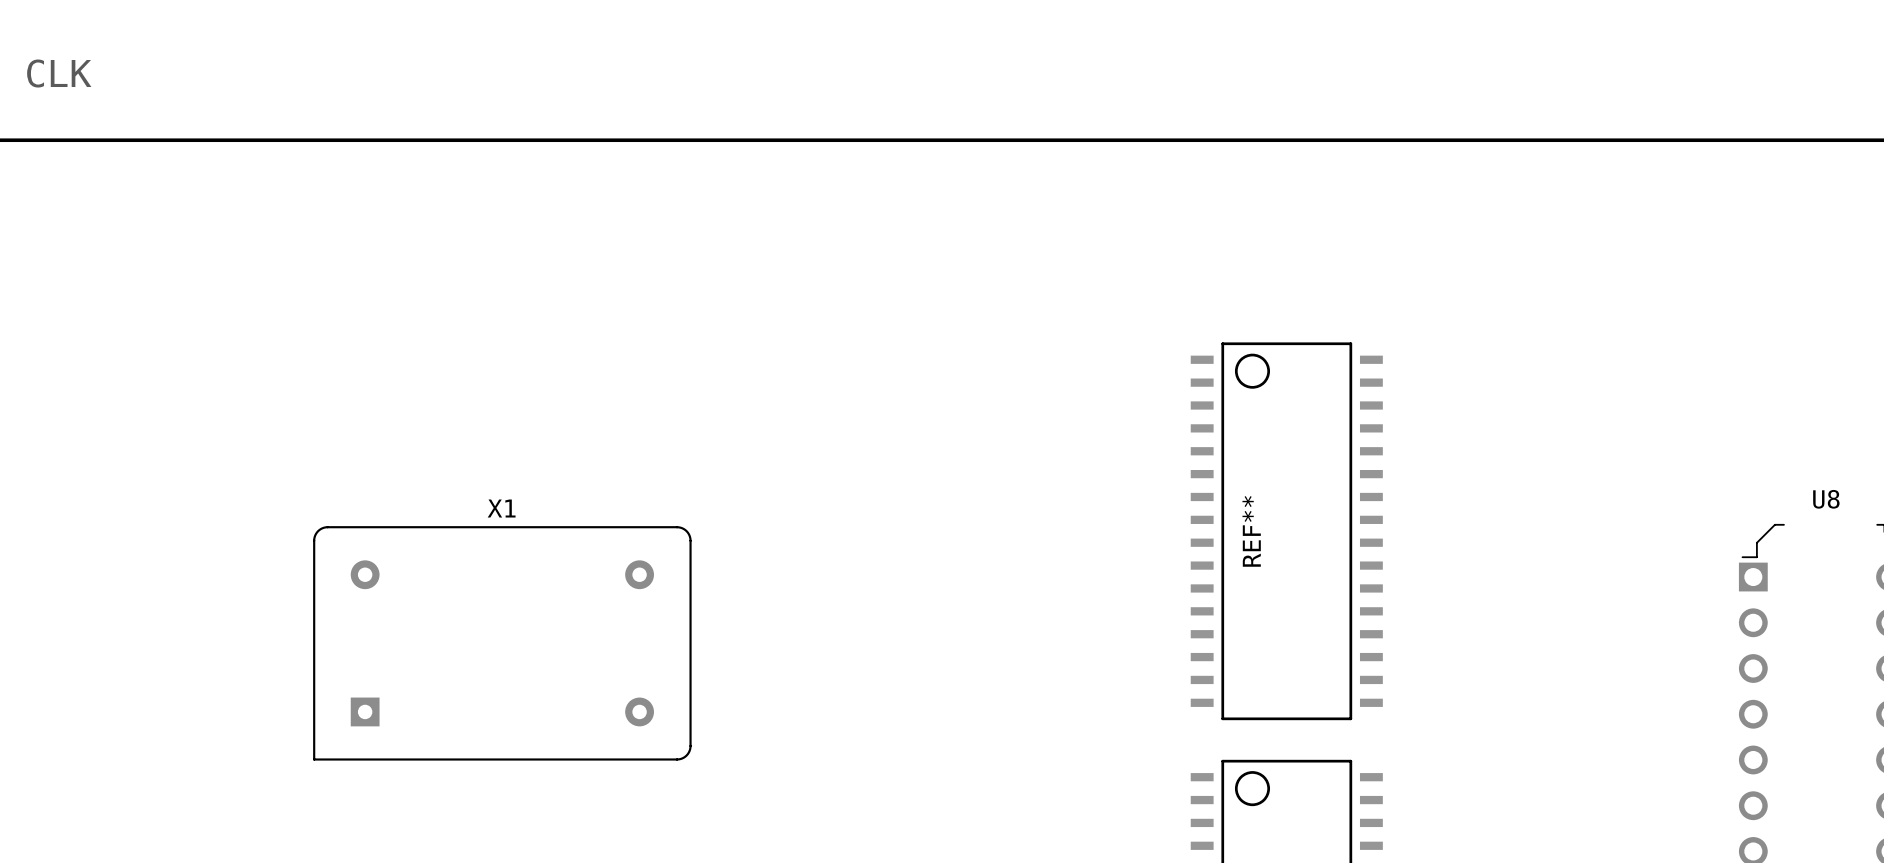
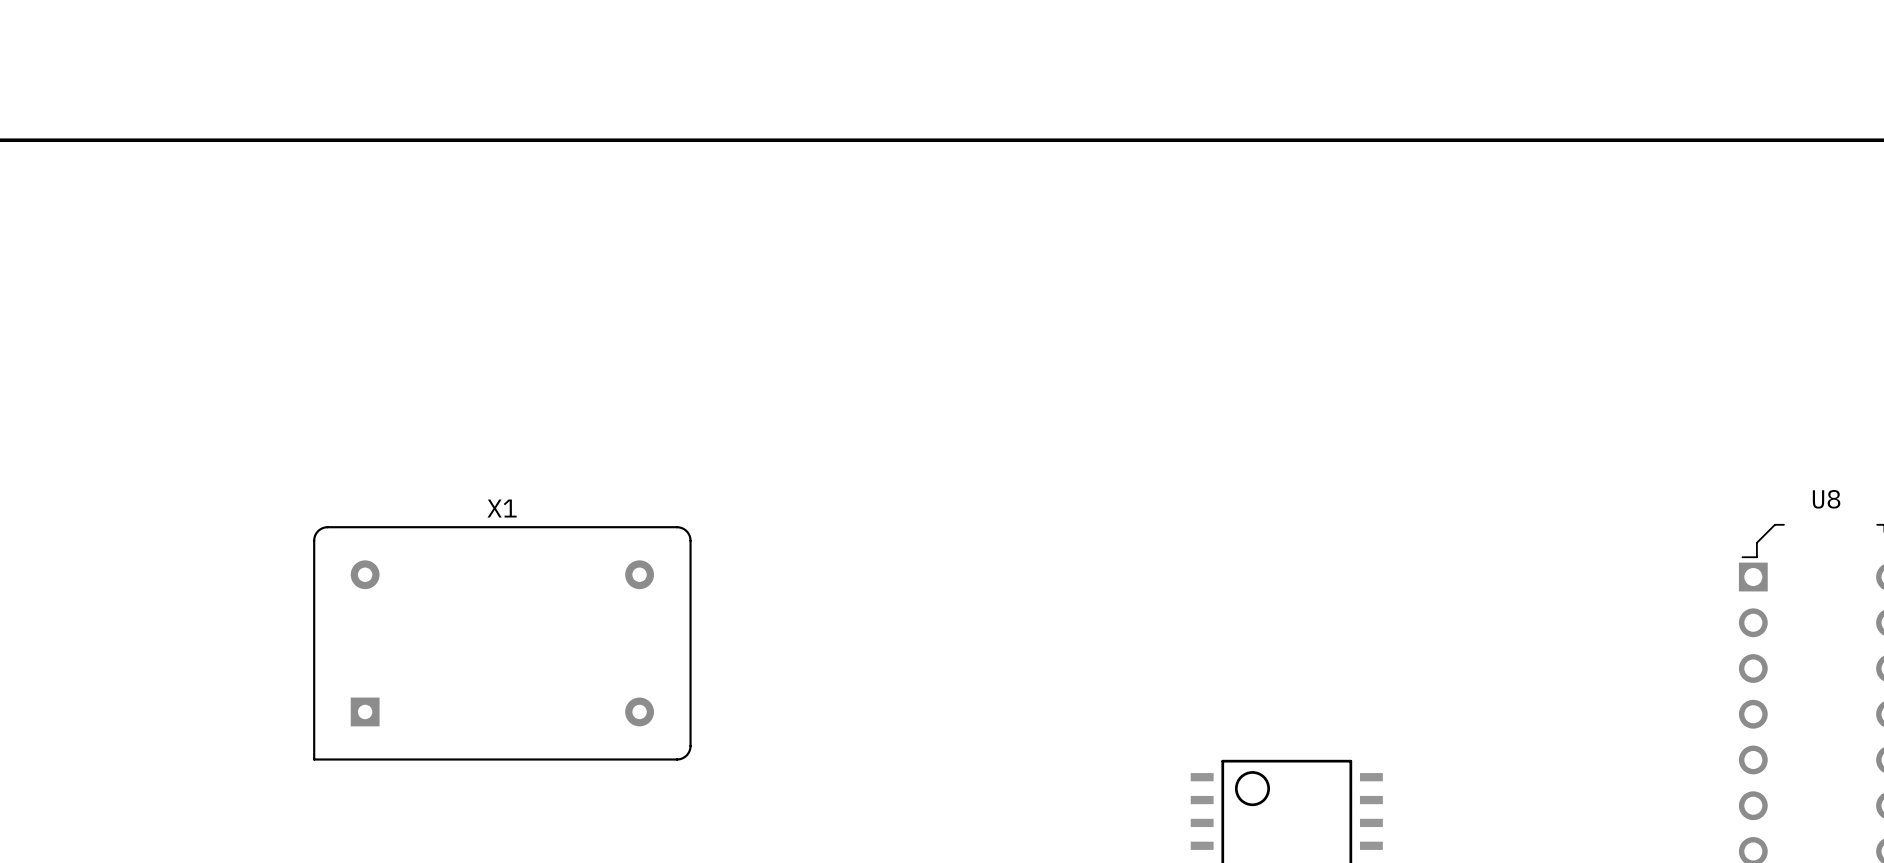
text: CLK (59, 73) -> none
REF**: (1286, 531) -> none

